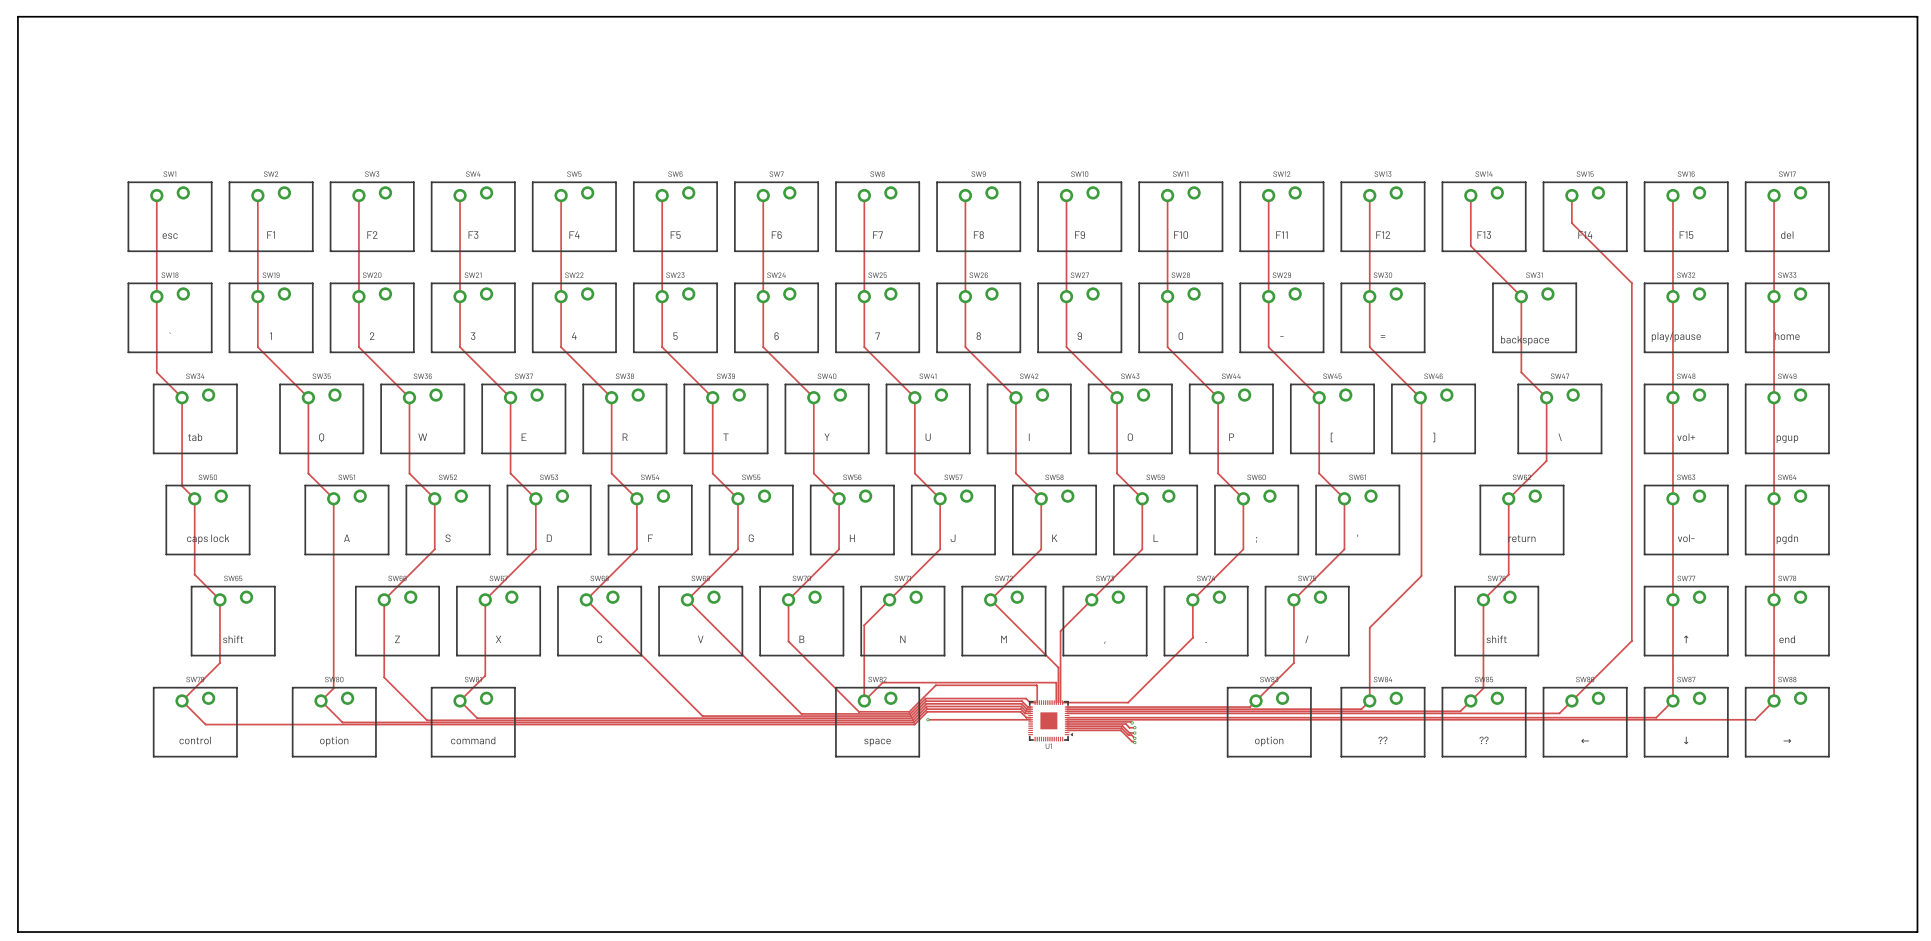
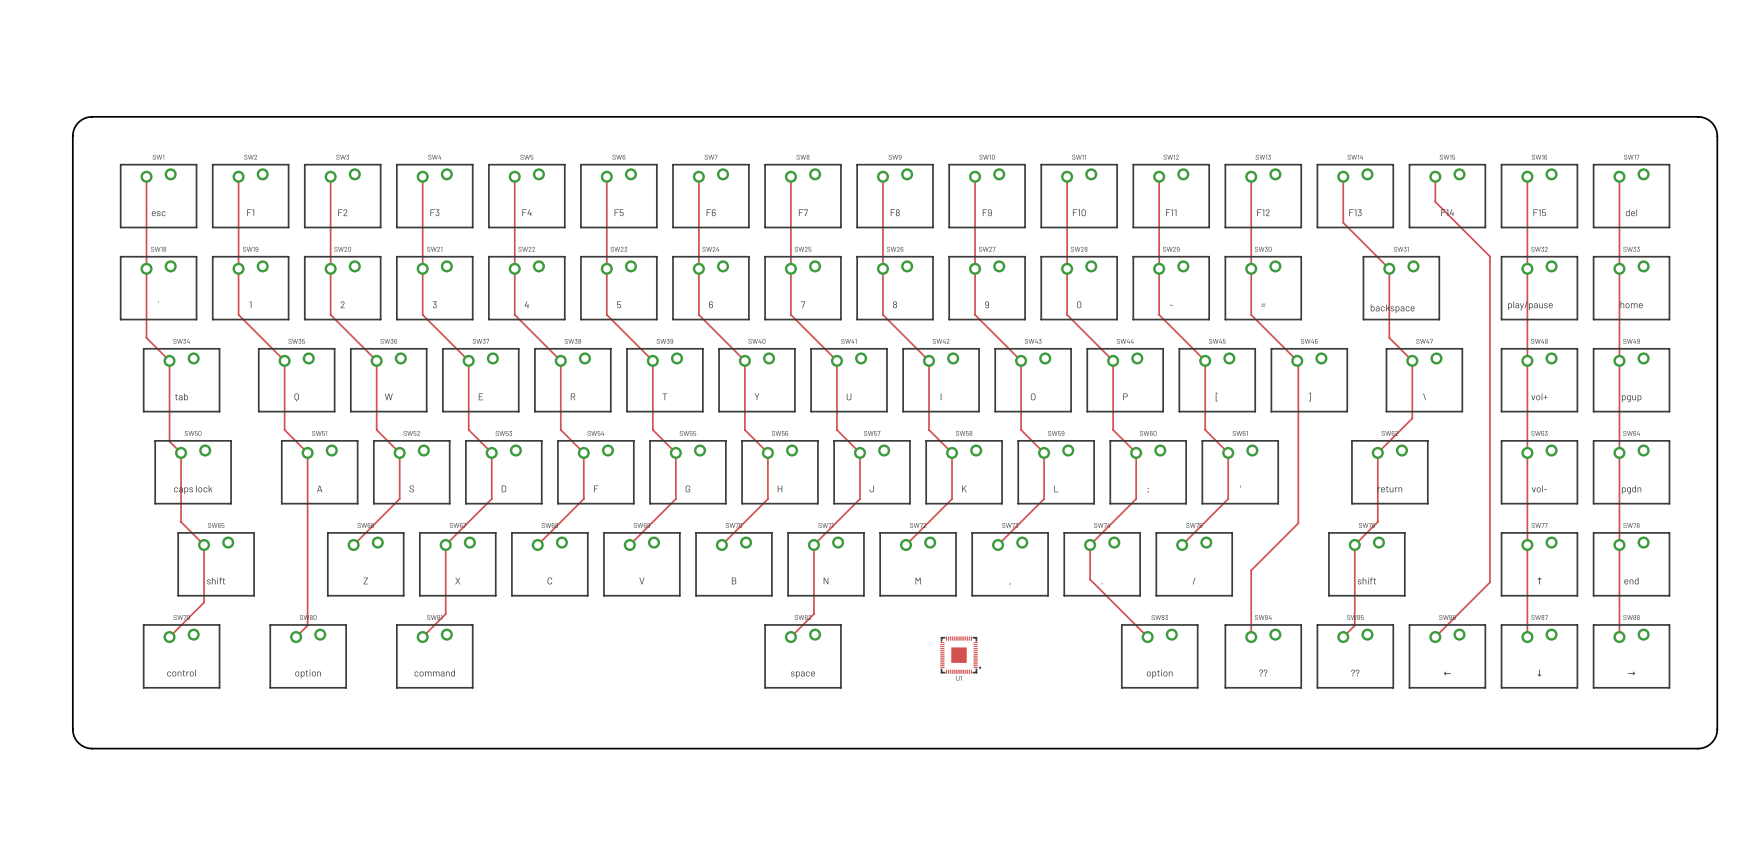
board edge: (17, 16) (1917, 16) (1917, 932) (17, 932) (17, 16) -> (92, 116) (78, 122) (72, 136) (72, 729) (75, 738) (84, 747) (1697, 748) (1707, 746) (1715, 736) (1717, 136) (1714, 126) (1705, 118) (92, 116)
track: (384, 599) (384, 677) (427, 720) (912, 720) (926, 706) (1021, 706) (1026, 711) (1030, 711) -> none
track: (586, 599) (702, 716) (911, 716) (925, 701) (1021, 701) (1027, 707) (1030, 707) -> none
track: (687, 599) (801, 713) (910, 713) (925, 698) (1026, 698) (1030, 702) (1035, 702) -> none
track: (788, 599) (788, 641) (858, 711) (909, 711) (935, 685) (1036, 685) (1037, 702) -> none
track: (889, 599) (864, 625) (864, 700) -> (813, 544) (813, 614) (807, 620)
track: (990, 599) (1058, 667) (1058, 702) -> none
track: (1293, 599) (1293, 663) (1249, 707) (1067, 707) -> none
track: (1092, 600) (1060, 631) (1060, 702) -> none
track: (1192, 637) (1128, 702) (1062, 702) -> (1090, 579) (1147, 637)
track: (882, 682) (1056, 682) (1056, 702) -> none
track: (182, 700) (205, 724) (914, 724) (927, 711) (1020, 711) (1026, 717) (1030, 717) -> none
track: (321, 700) (342, 722) (913, 722) (927, 709) (1020, 709) (1025, 713) (1030, 713) -> none
track: (460, 700) (477, 718) (911, 718) (926, 703) (1021, 703) (1026, 709) (1030, 709) -> none
track: (1369, 700) (1361, 709) (1067, 709) -> none
track: (1470, 700) (1460, 711) (1067, 711) -> none
track: (1571, 700) (1559, 713) (1067, 713) -> none
track: (1672, 700) (1656, 717) (1067, 717) -> none
track: (1774, 700) (1755, 719) (1067, 719) -> none
track: (927, 719) (1030, 719) -> none
via: (927, 719) -> none
track: (1067, 721) (1132, 722) -> none
via: (1132, 722) -> none
track: (1067, 724) (1125, 724) (1129, 727) (1134, 727) -> none
track: (1067, 726) (1122, 726) (1129, 733) (1134, 733) -> none
via: (1134, 727) -> none
track: (1067, 728) (1121, 728) (1134, 738) -> none
track: (1067, 730) (1120, 730) (1134, 742) -> none
via: (1134, 733) -> none
via: (1134, 738) -> none
via: (1134, 742) -> none

